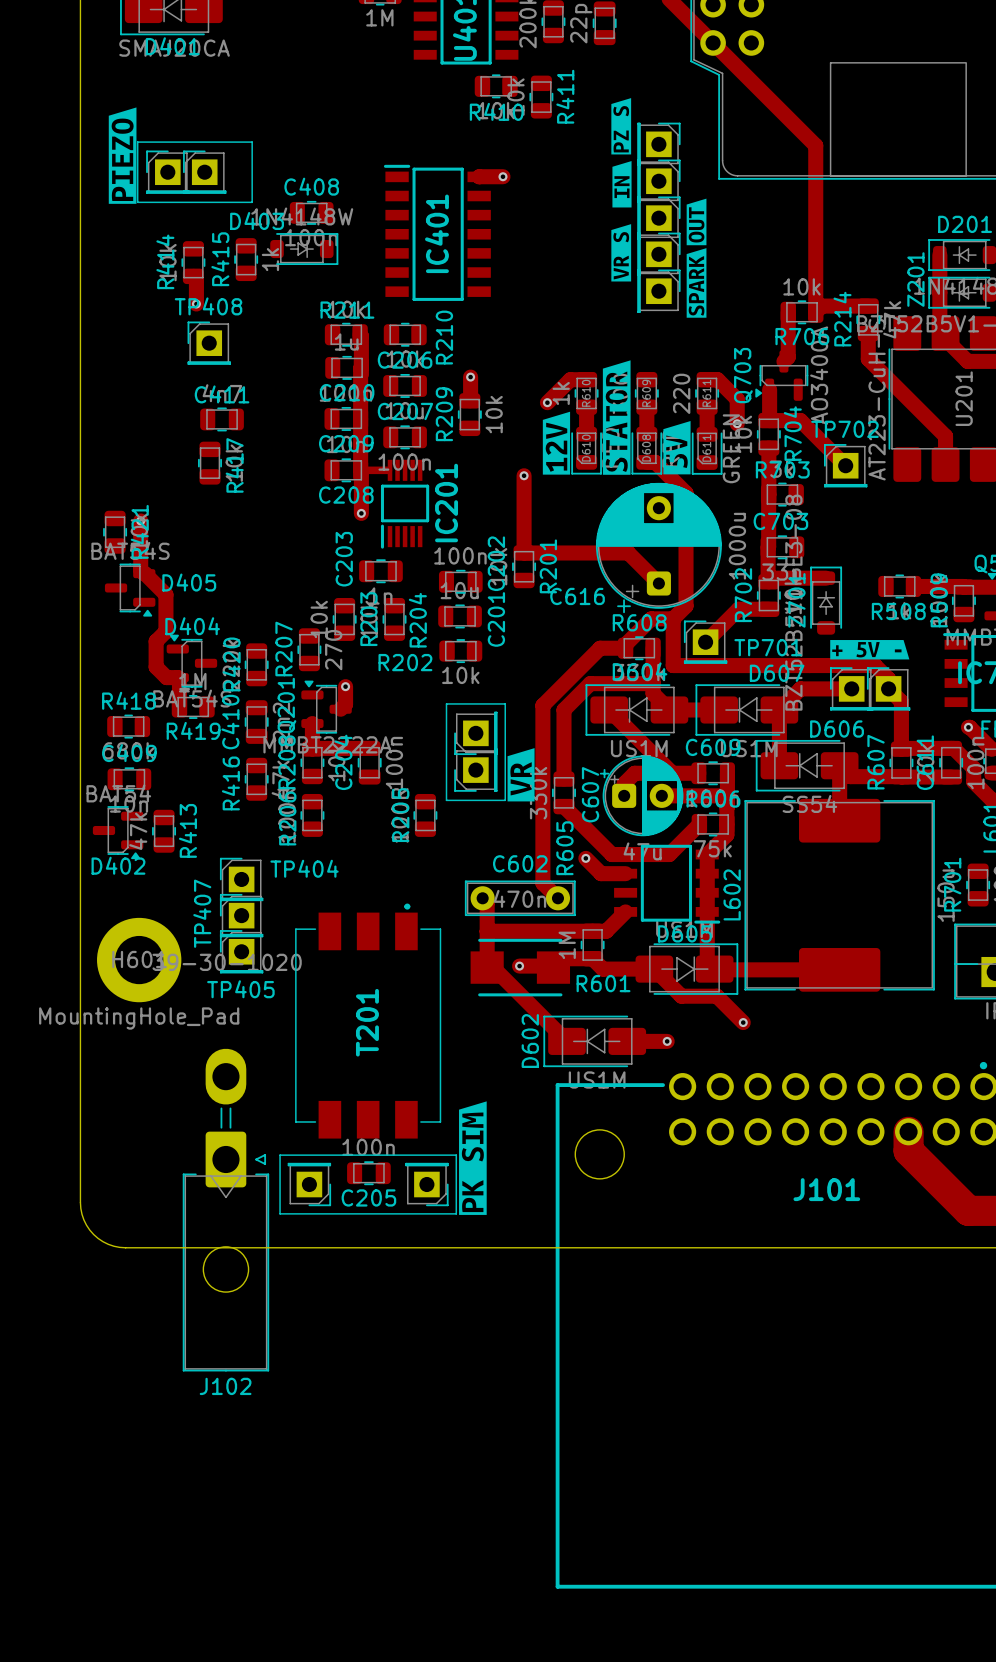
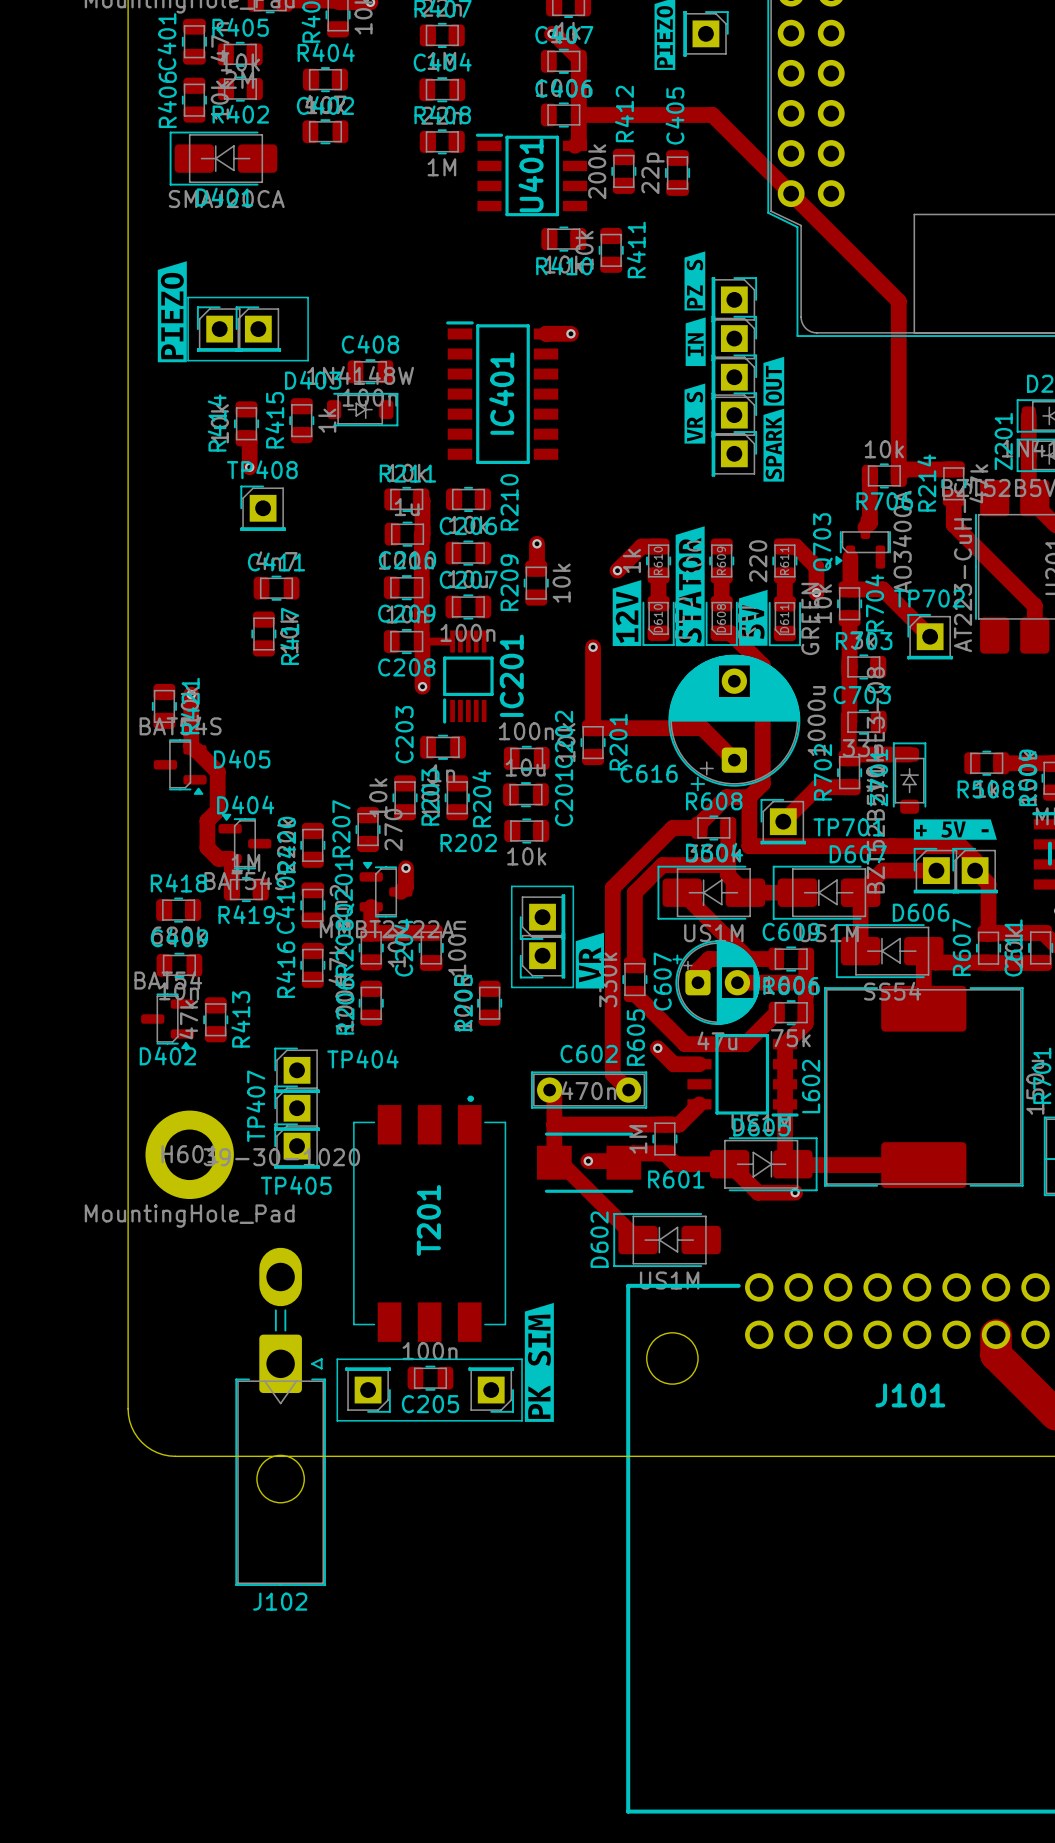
track: (716, 996) (743, 1022) -> none
via: none -> (795, 1192)
via: (743, 1022) -> none
track: (627, 1041) (667, 1041) -> none
via: (667, 1041) -> none

